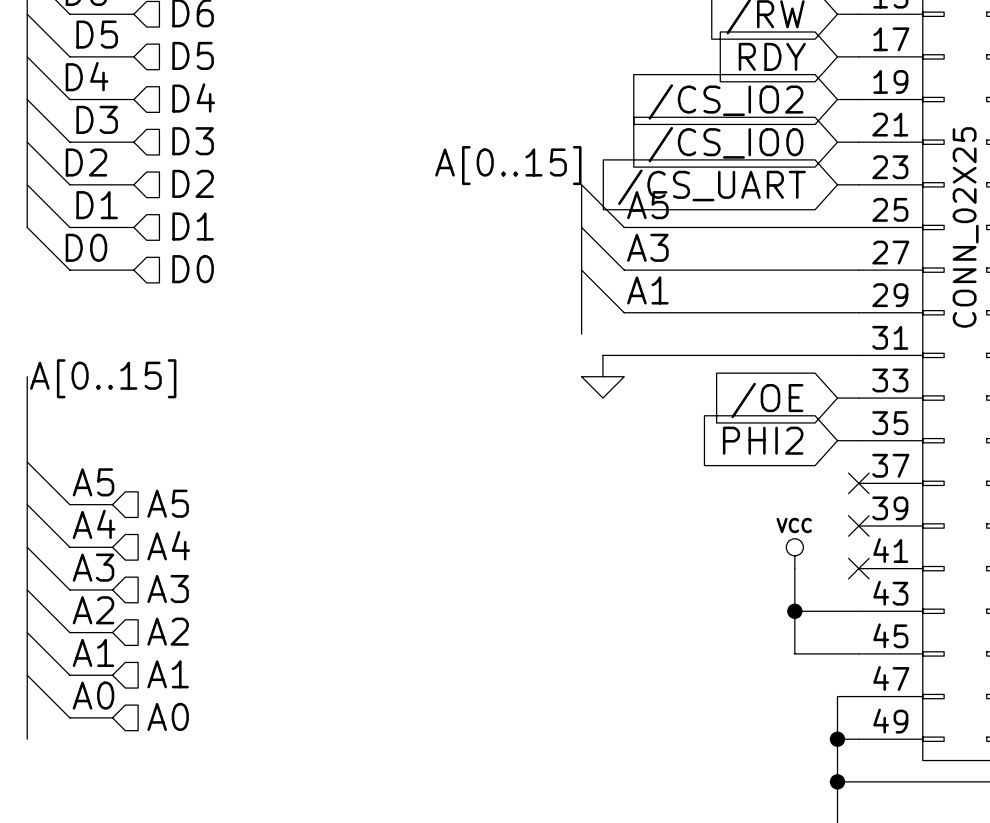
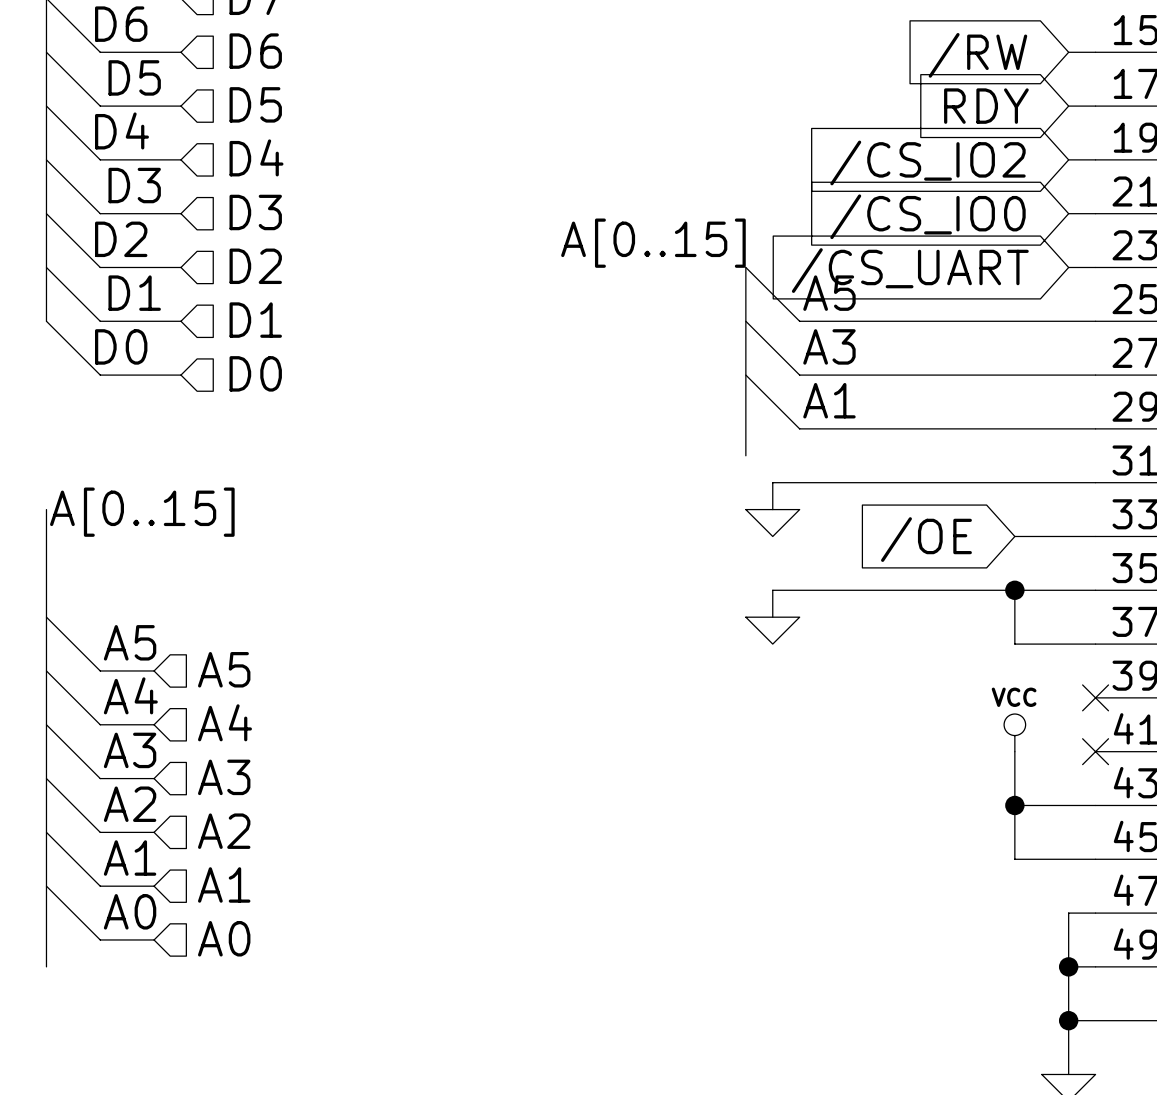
wire: none -> (1014, 536) (1068, 536)
global label position: /OE (767, 400) -> /OE (926, 539)
global label: PHI2 (763, 440) -> none
wire: none -> (1014, 590) (1014, 644) (1095, 644)
junction: none -> (1014, 590)
wire: none -> (1068, 590) (772, 590) (772, 617)
power symbol: none -> (772, 630)
no-connect mark: (858, 483) -> none

